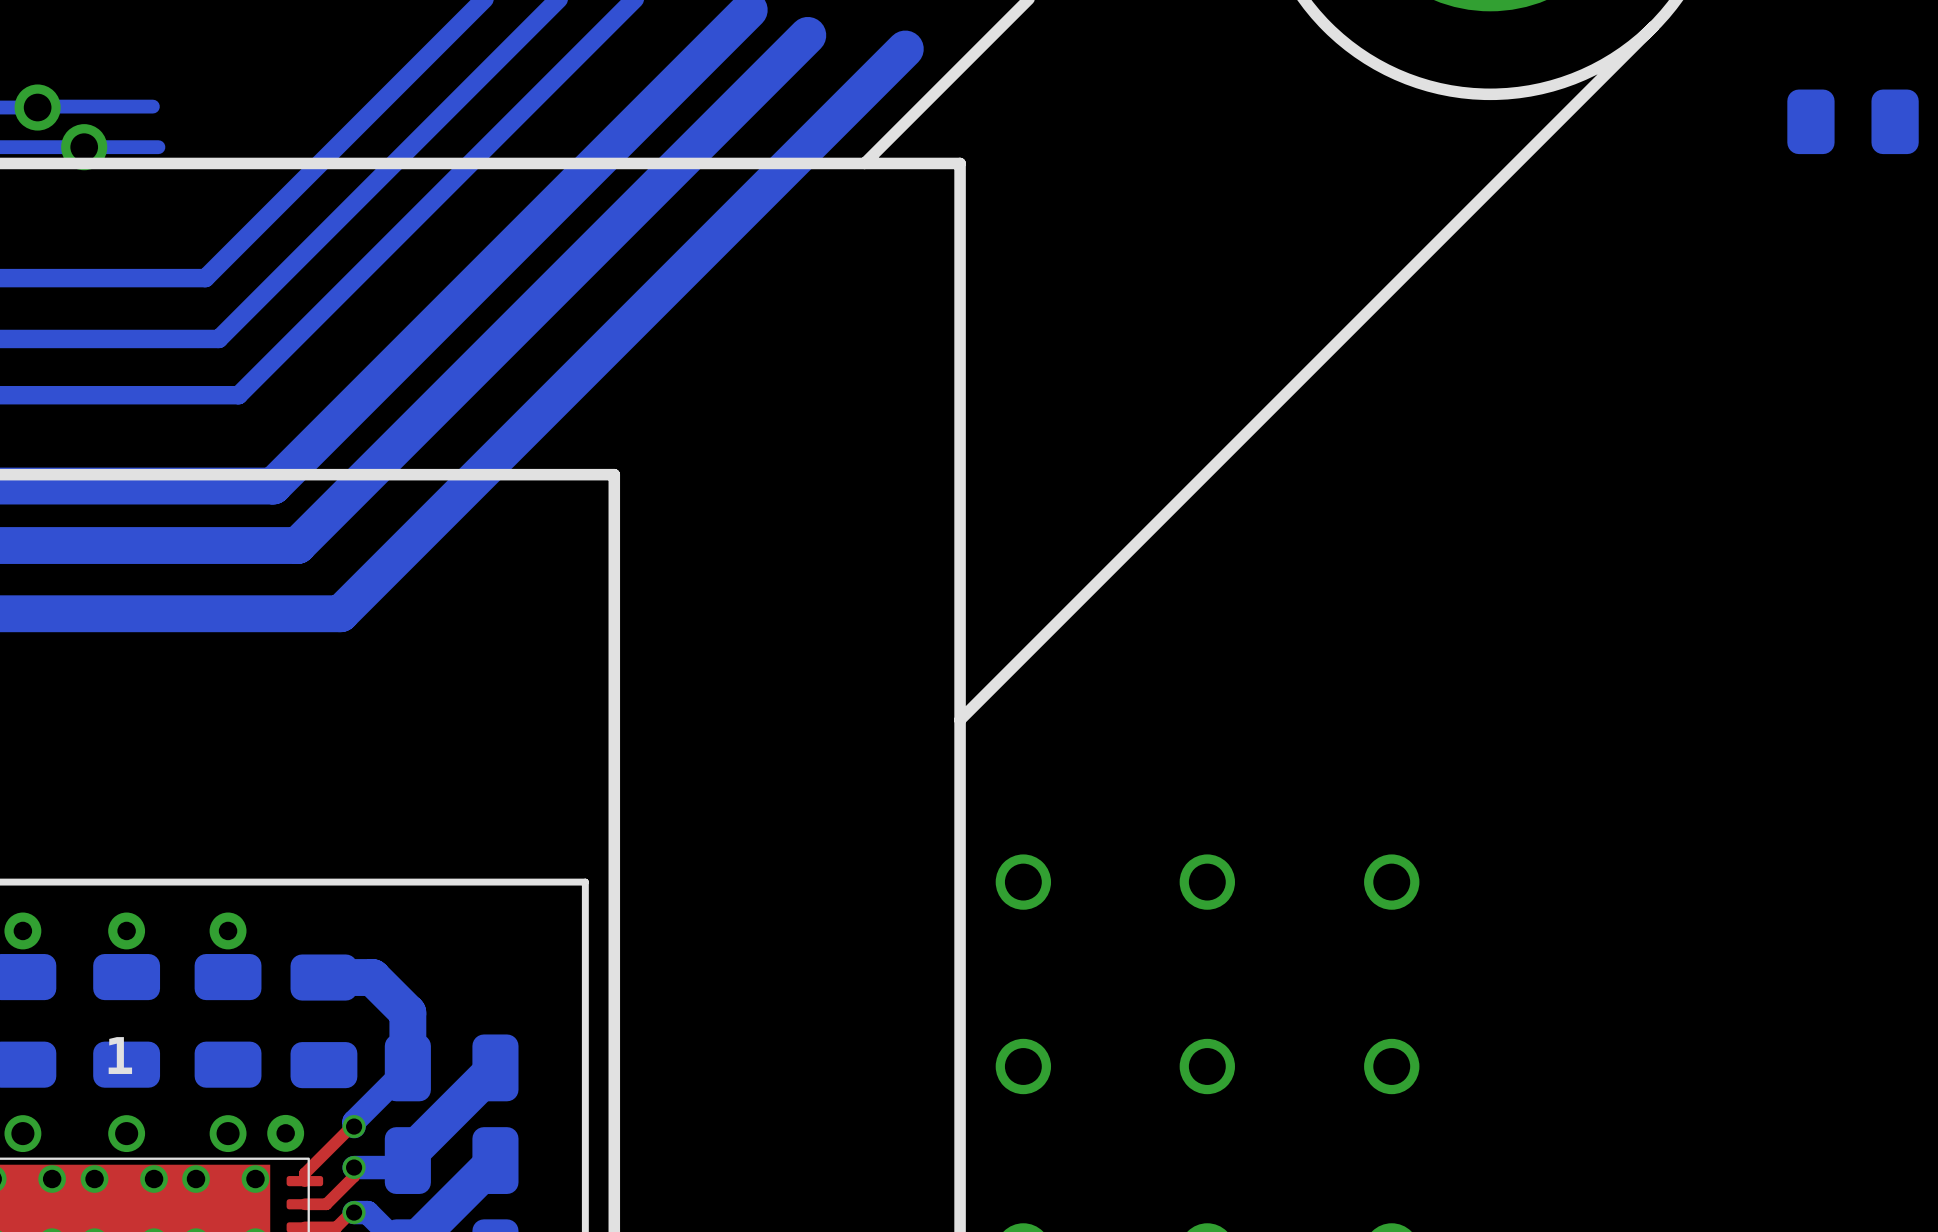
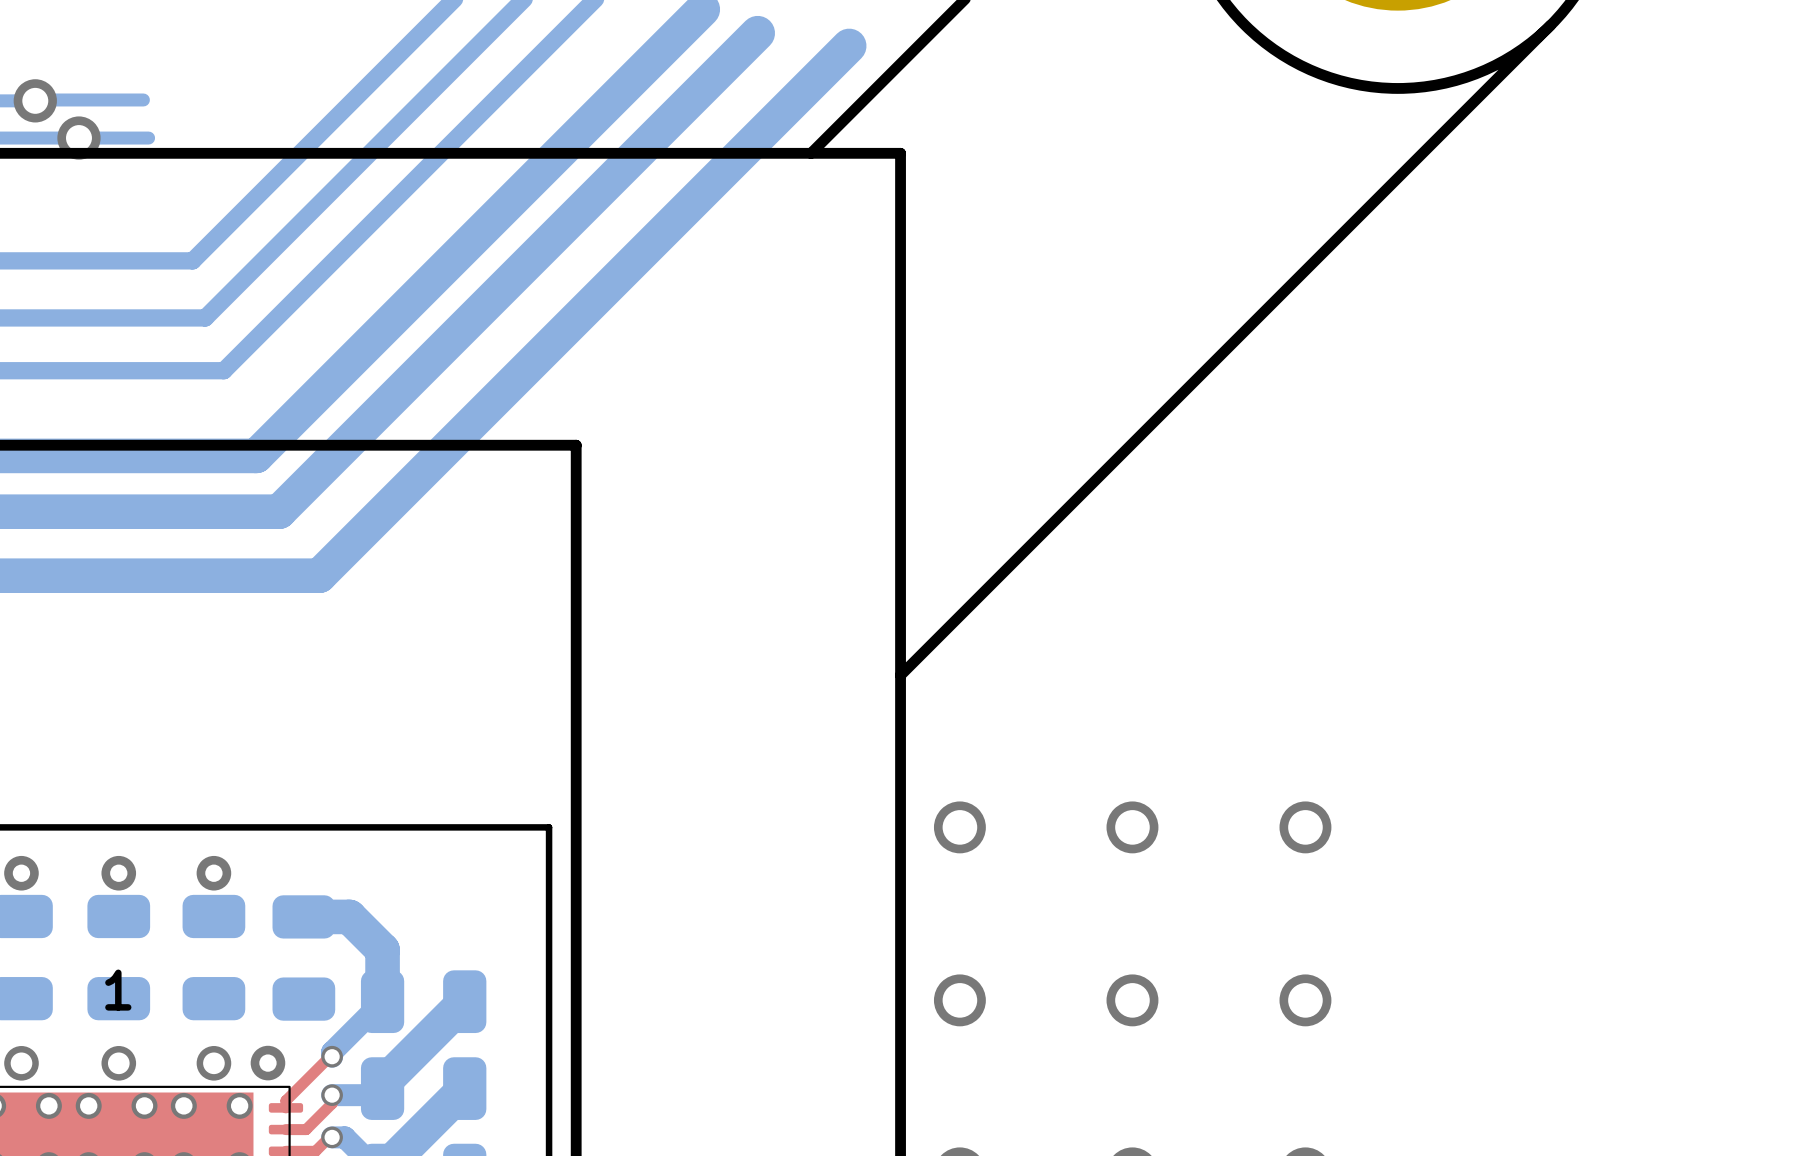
part: (1853, 121) -> none

